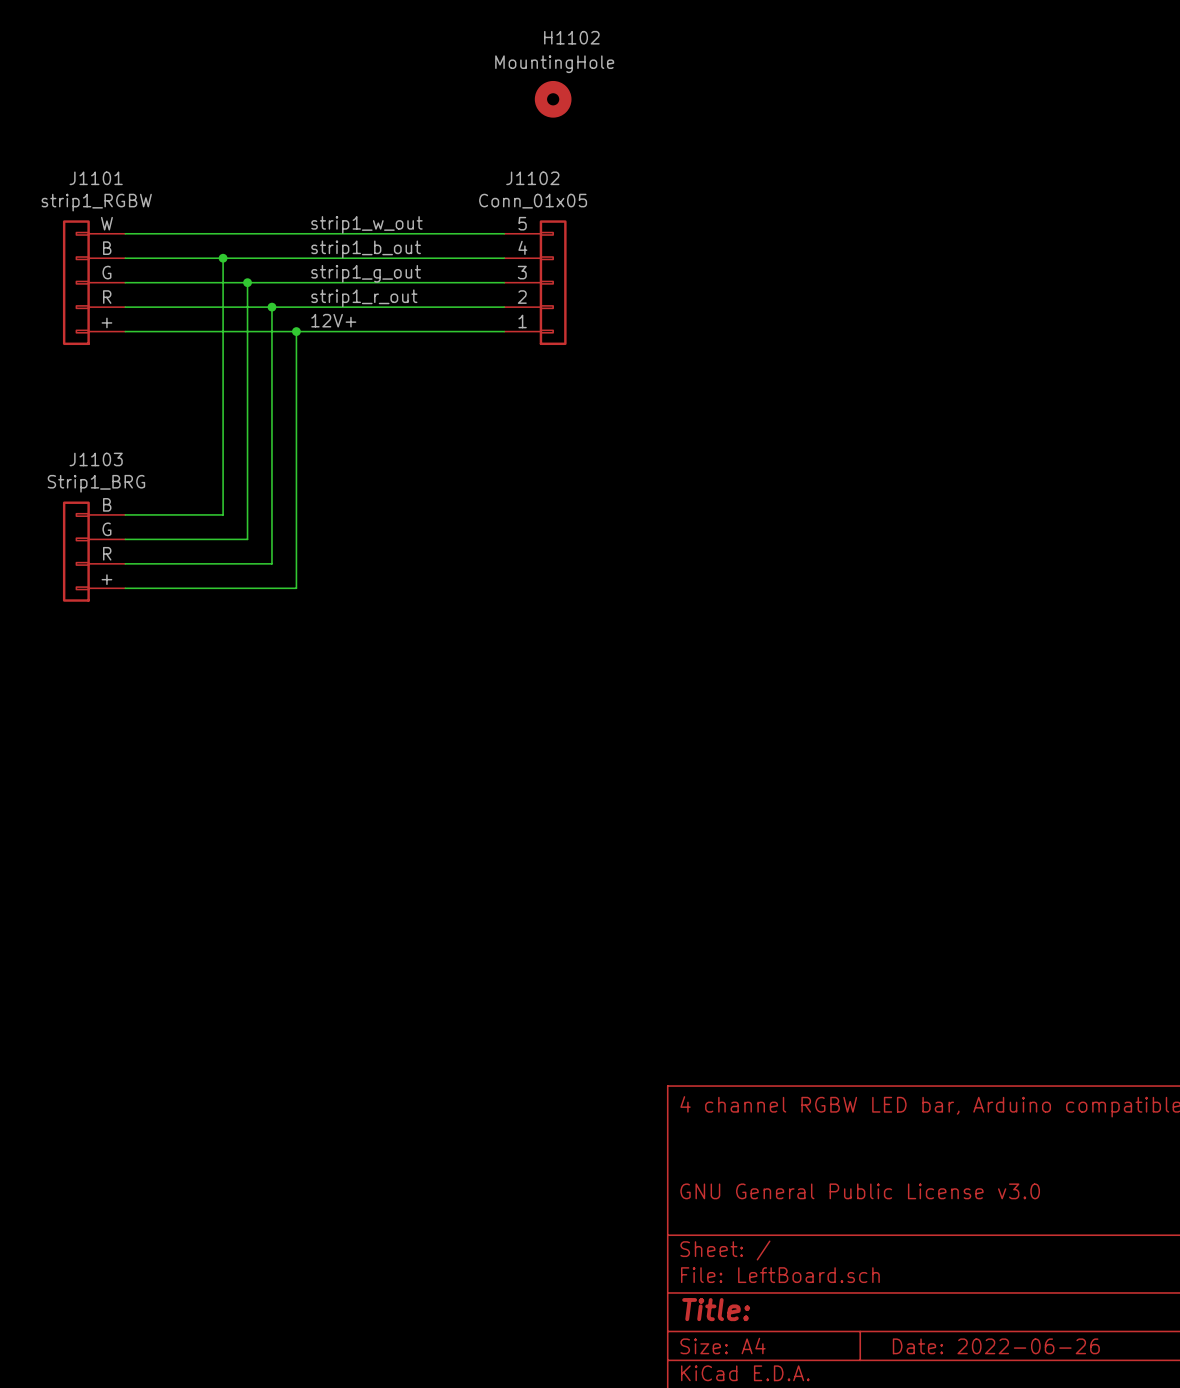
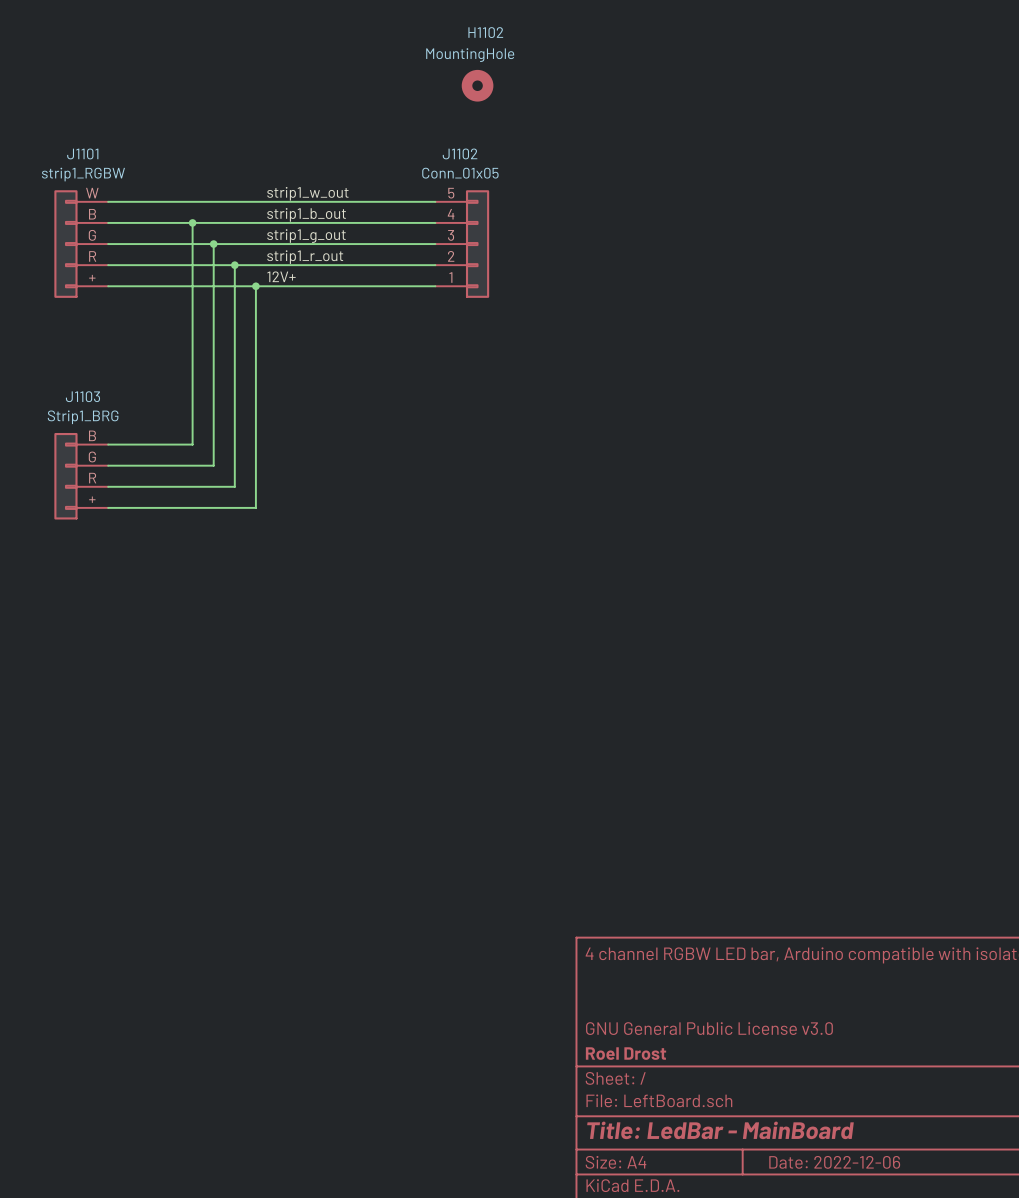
title block: none -> Roel Drost (626, 1053)
title block: Title: (716, 1309) -> Title: LedBar - MainBoard (720, 1130)
title block: Date: 2022-06-26 (996, 1346) -> Date: 2022-12-06 (834, 1162)

